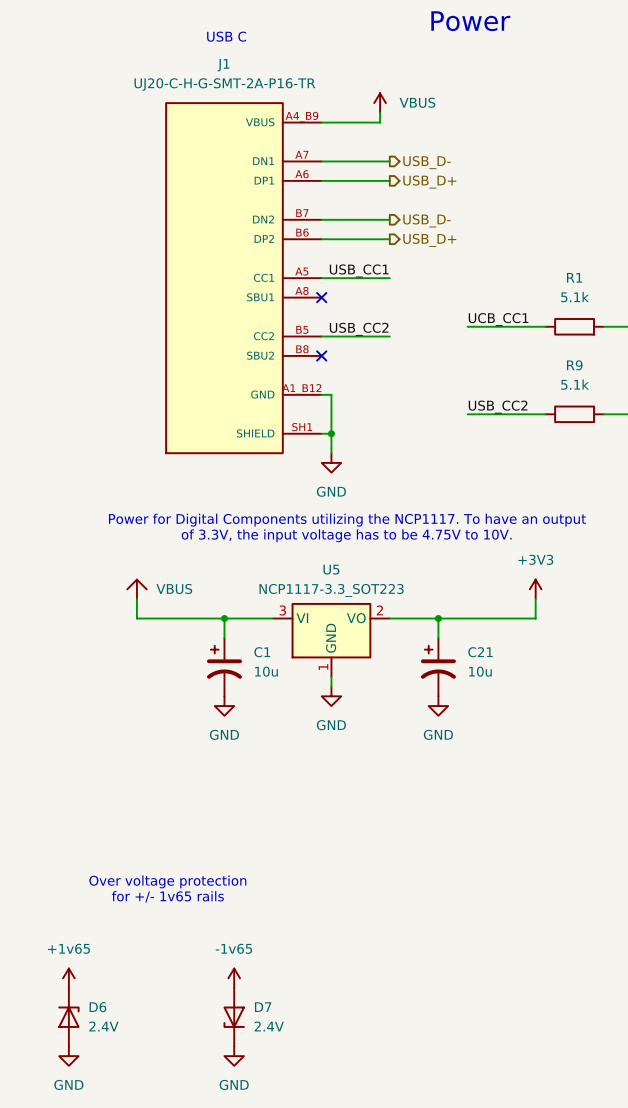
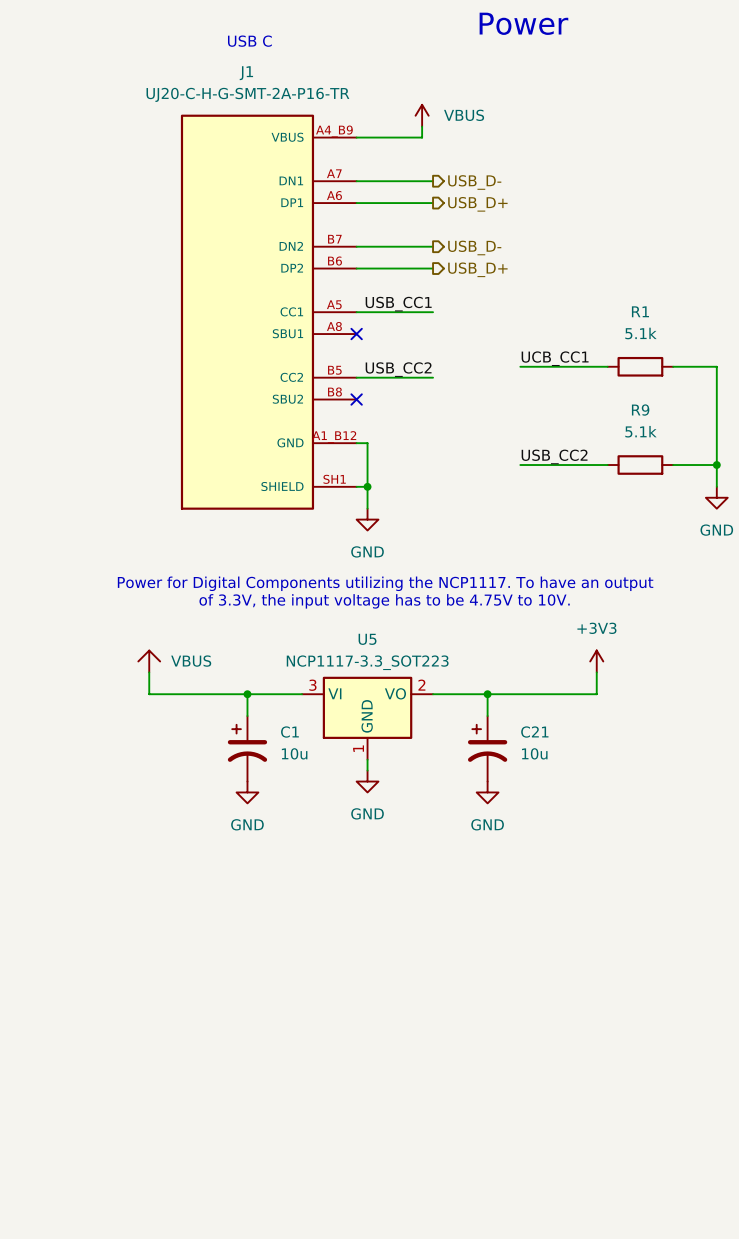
text: Over voltage protection (167, 881) -> none
text: for +/- 1v65 rails (167, 896) -> none
power symbol: +1v65 (68, 978) -> none
power symbol: -1v65 (234, 978) -> none
D6: 2.4V (68, 1017) -> none
D7: 2.4V (234, 1017) -> none
power symbol: GND (68, 1056) -> none
power symbol: GND (234, 1056) -> none

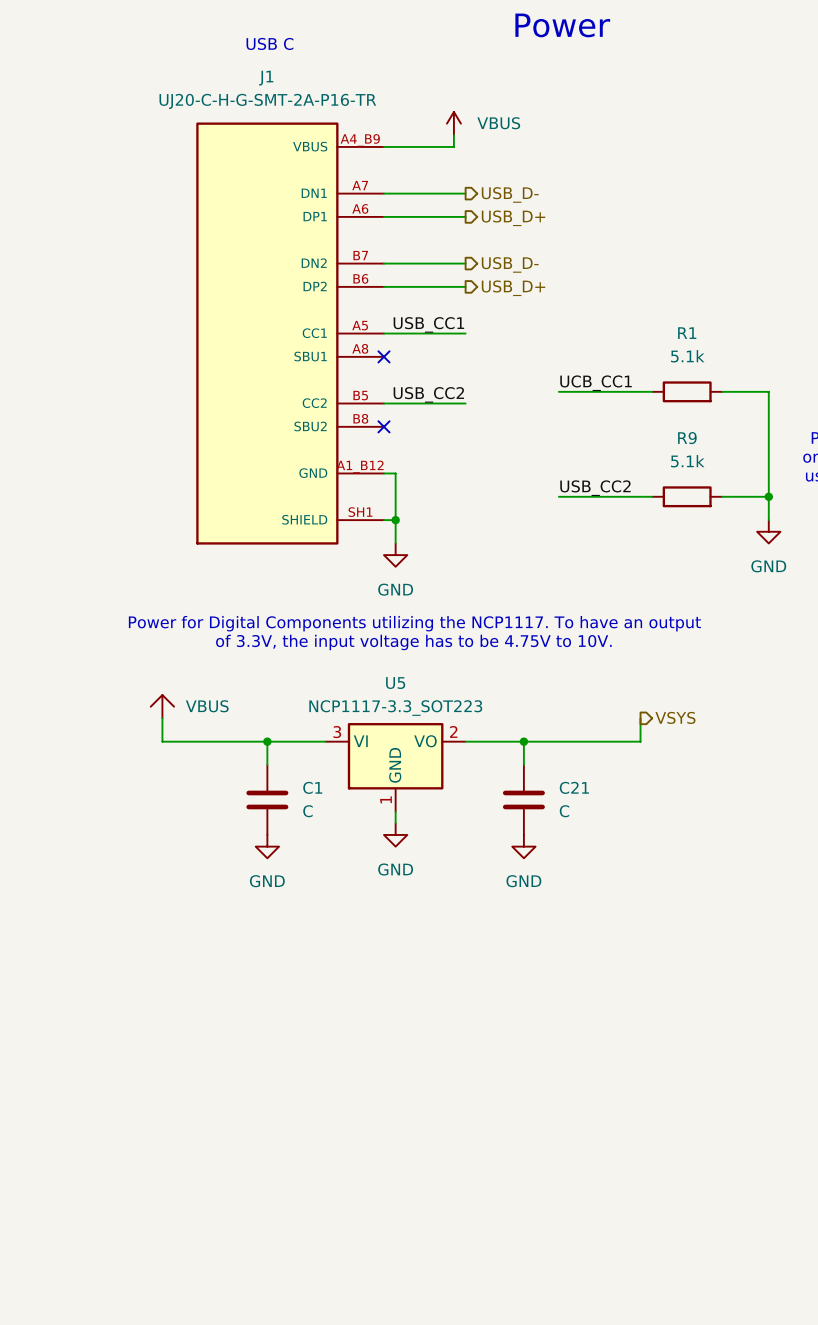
power symbol: +3V3 (596, 661) -> none
hierarchical label: none -> VSYS (675, 717)
C1 symbol: [227, 716, 268, 782] -> [246, 765, 289, 835]
C21 symbol: [467, 716, 508, 782] -> [502, 765, 545, 835]
C1 value: 10u (294, 753) -> C (307, 811)
C21 value: 10u (534, 753) -> C (564, 811)

